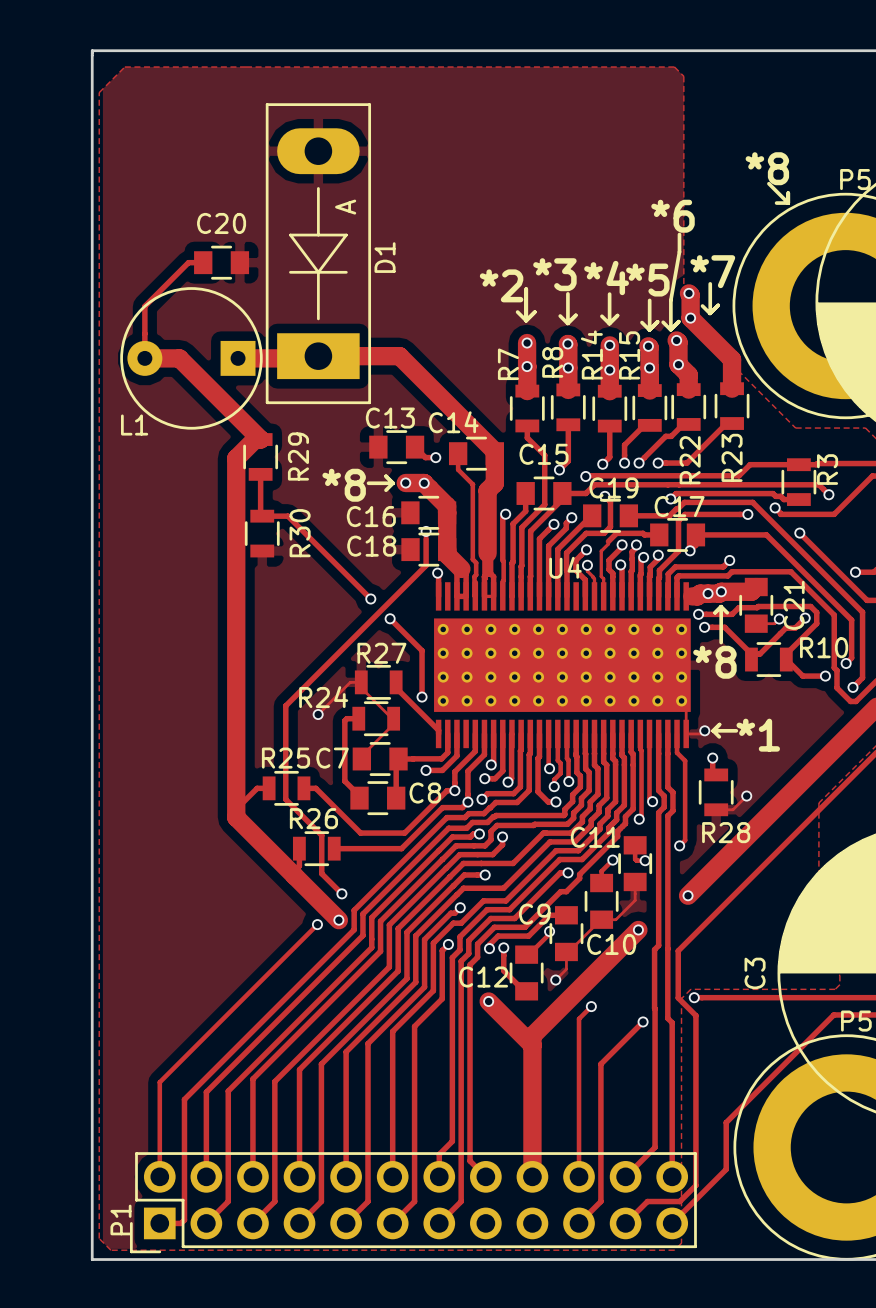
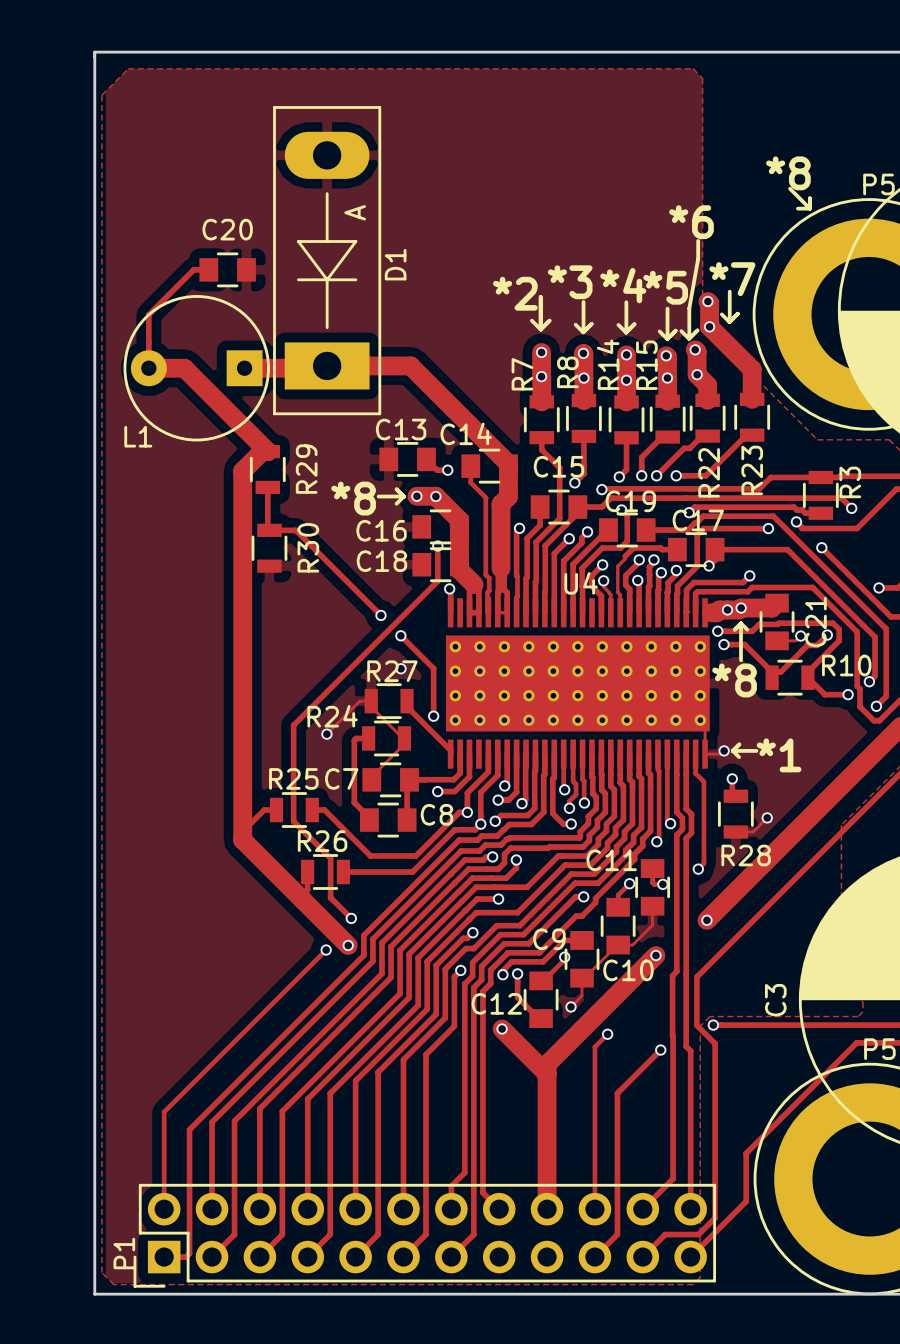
via: none -> (401, 668)

